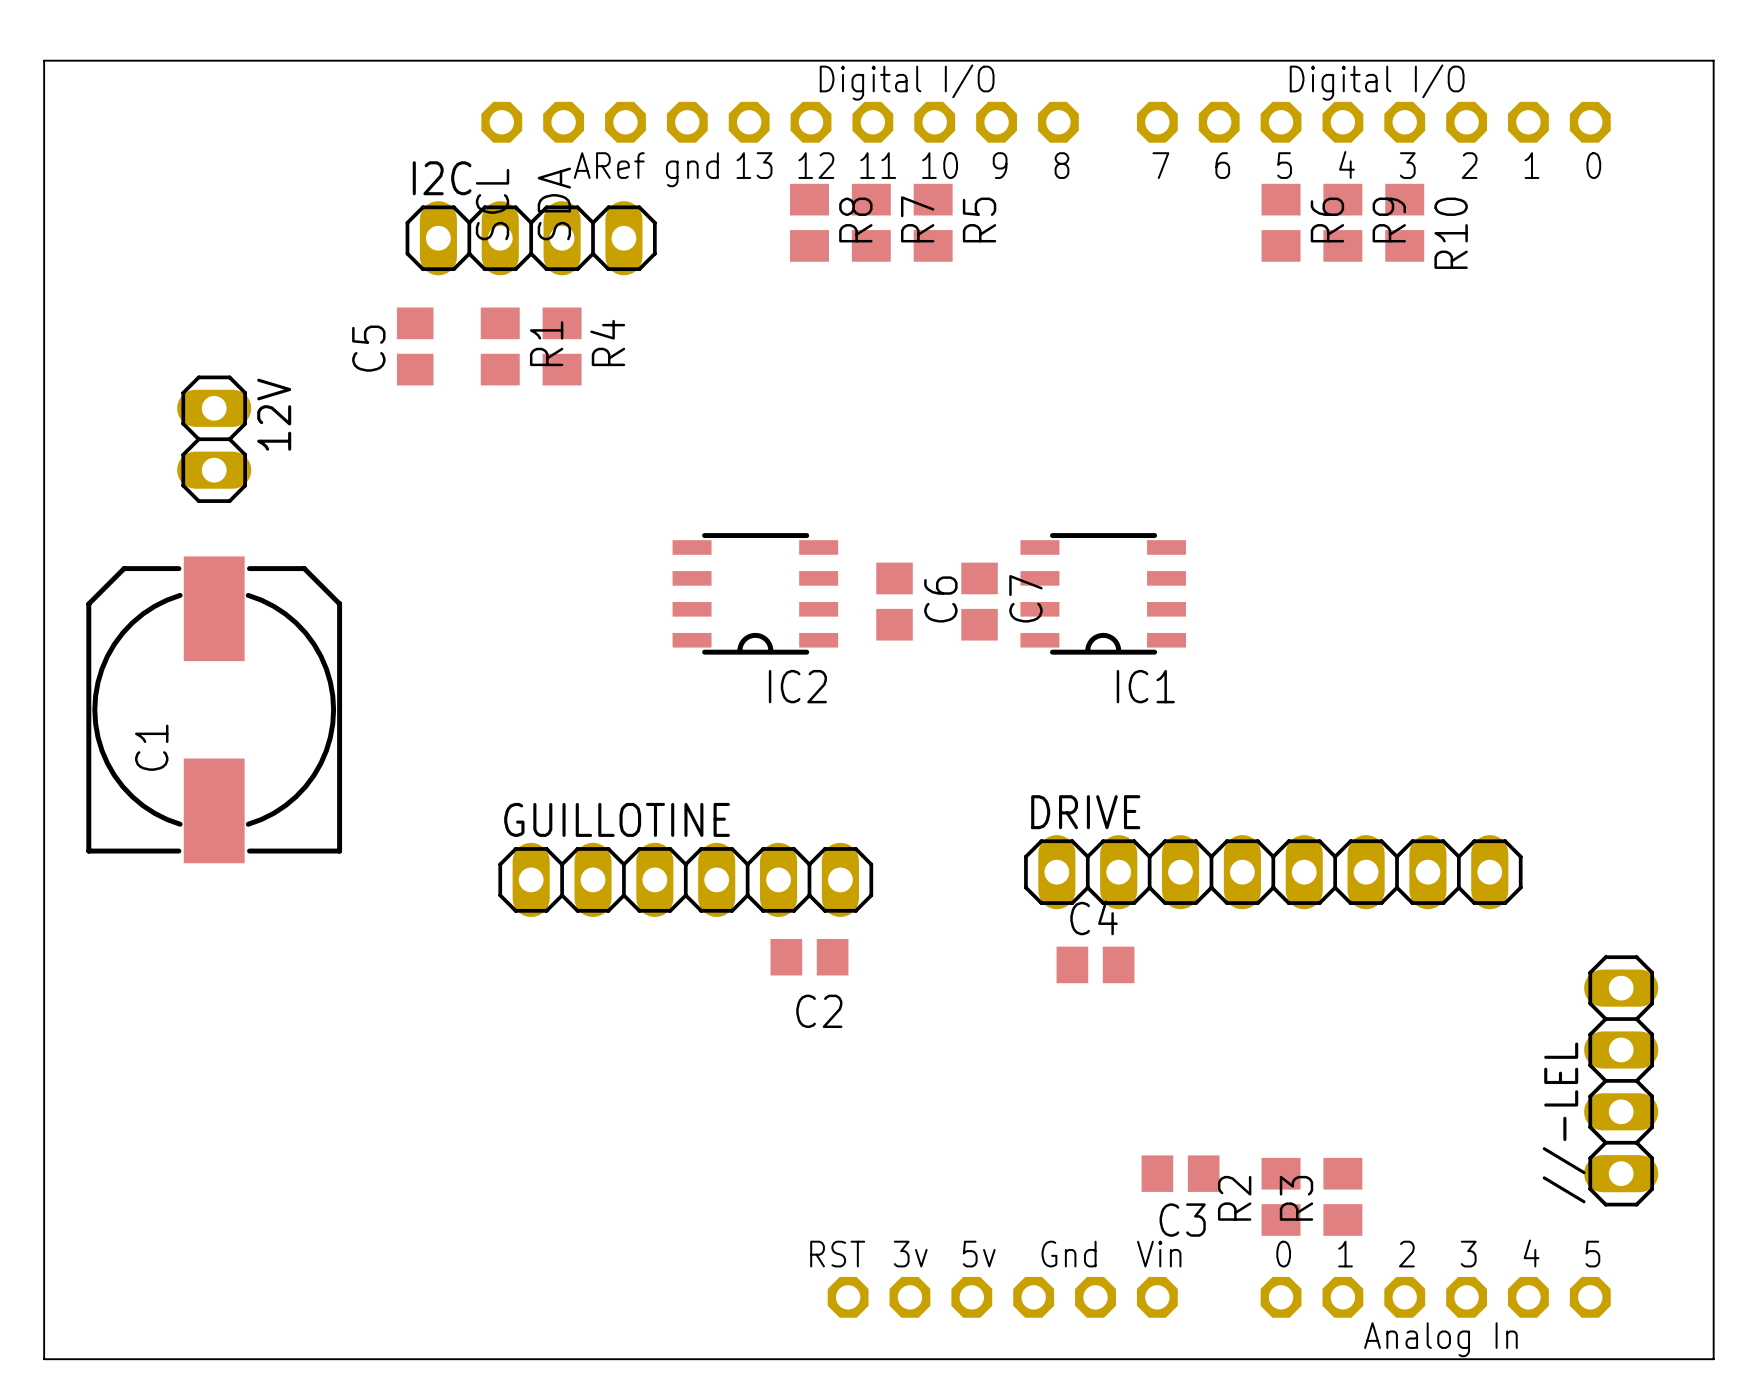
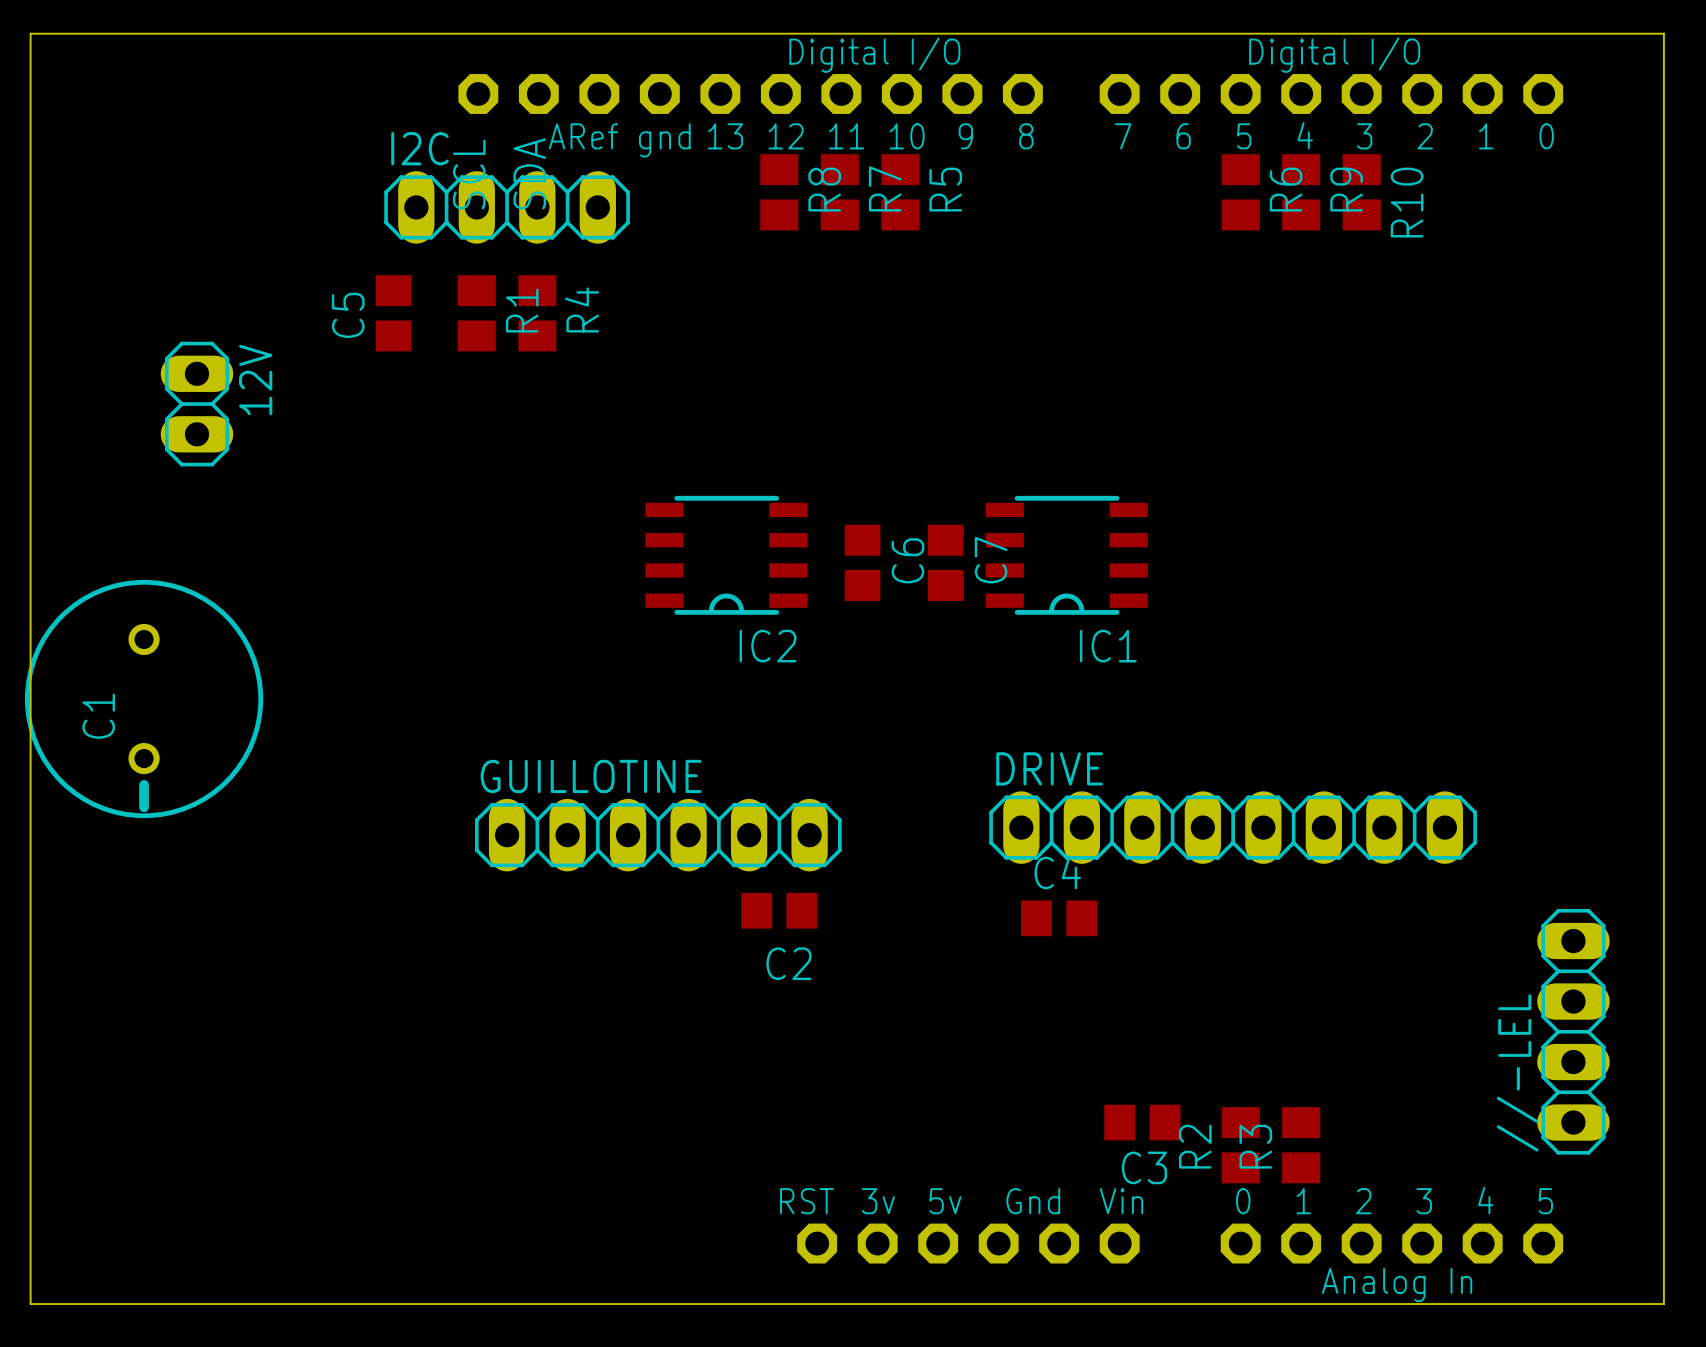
C1 footprint: [86, 556, 343, 864] -> [24, 579, 264, 819]

